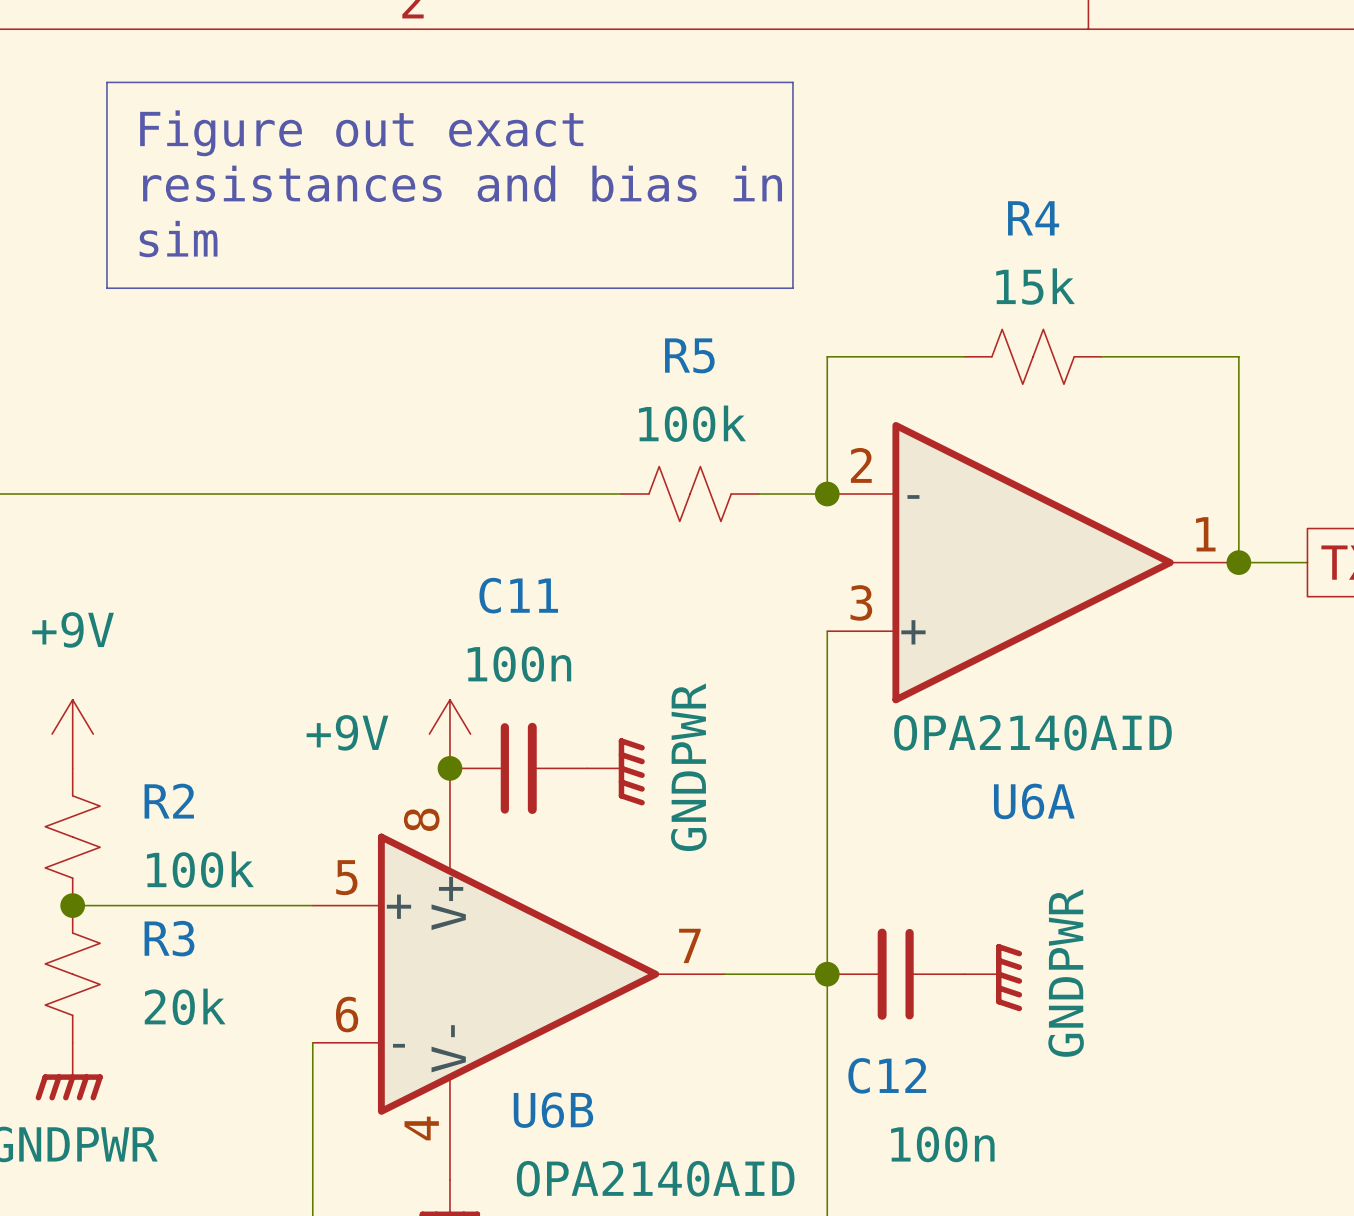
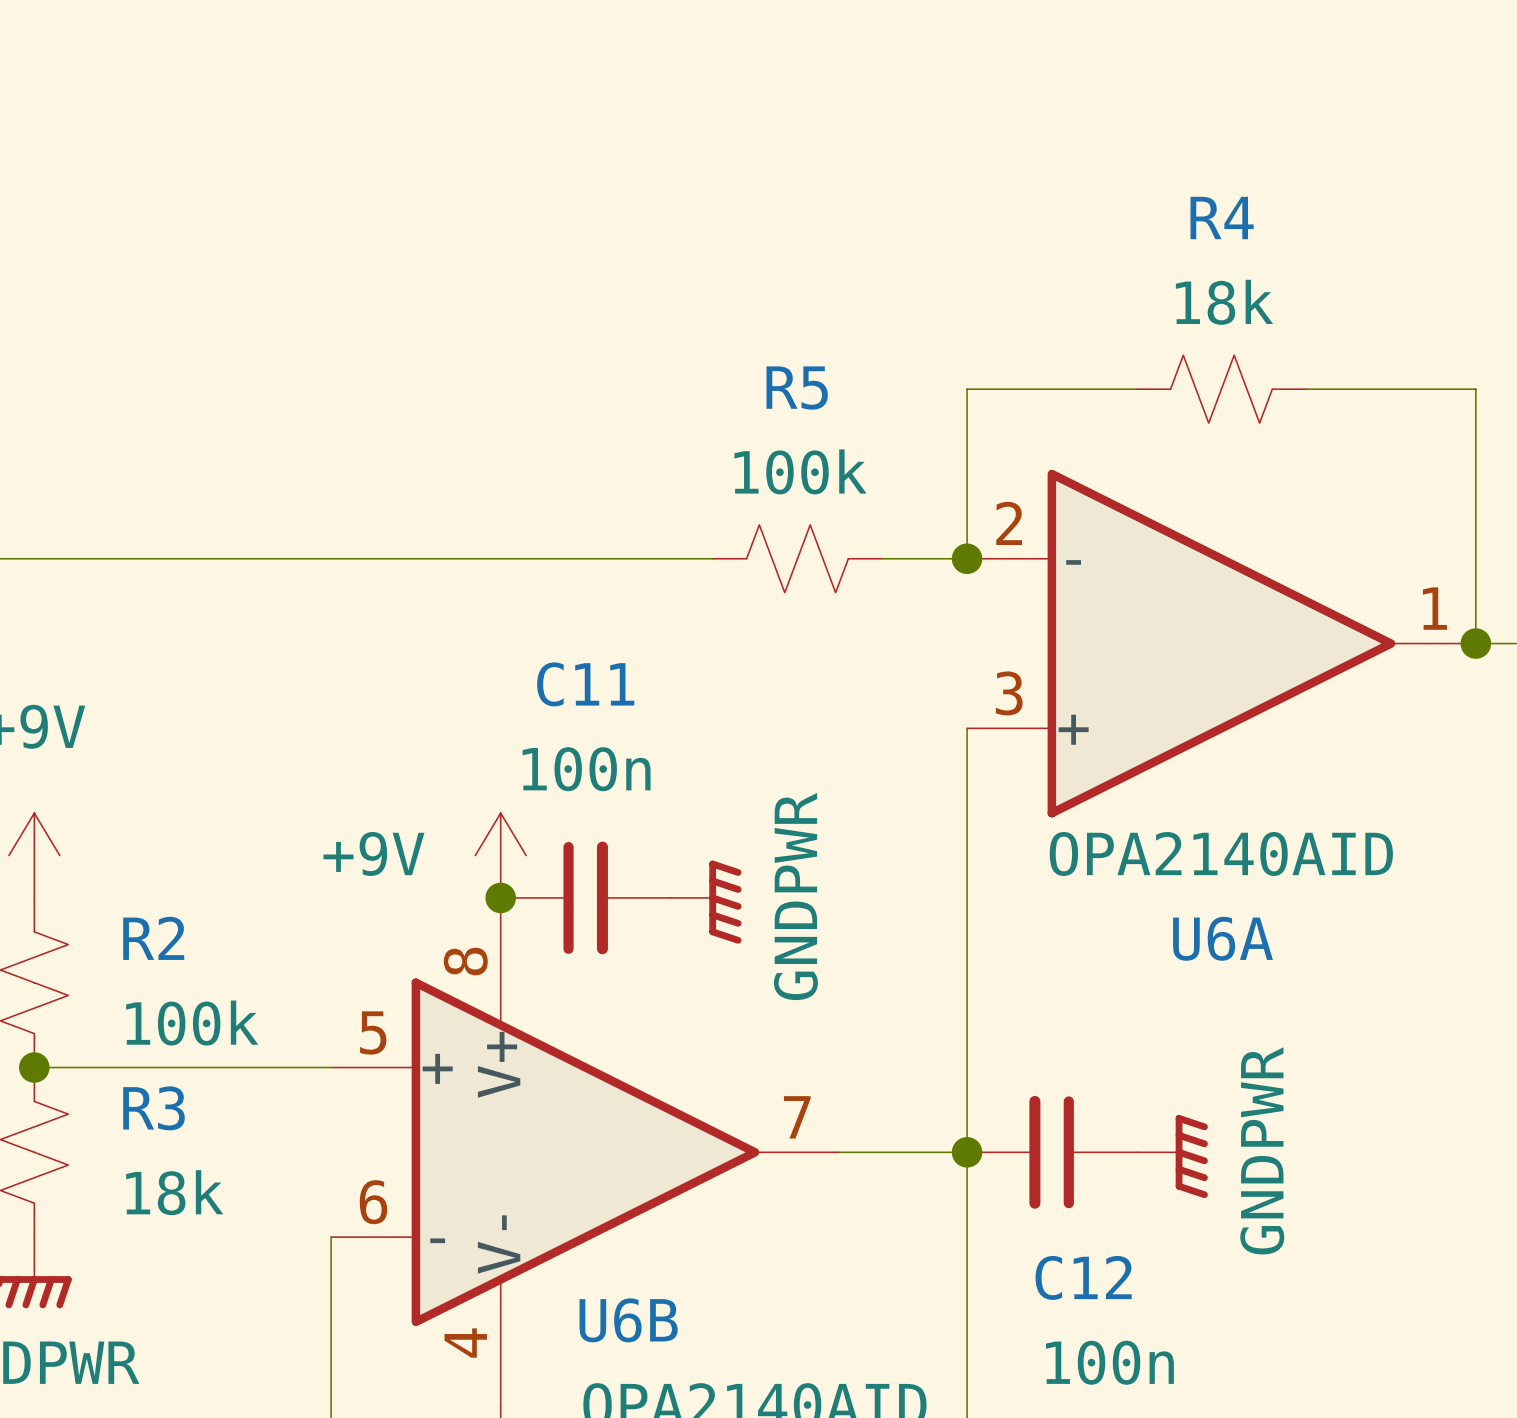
line: (106, 82) (792, 82) (792, 288) (106, 288) (106, 82) -> none
text: Figure out exact (361, 133) -> none
text: resistances and bias in (462, 183) -> none
text: sim (178, 239) -> none
R4 value: 15k (1035, 286) -> 18k (1224, 302)
R3 value: 20k (185, 1006) -> 18k (174, 1192)
C12 name position: C12 (887, 1075) -> C12 (1083, 1277)

